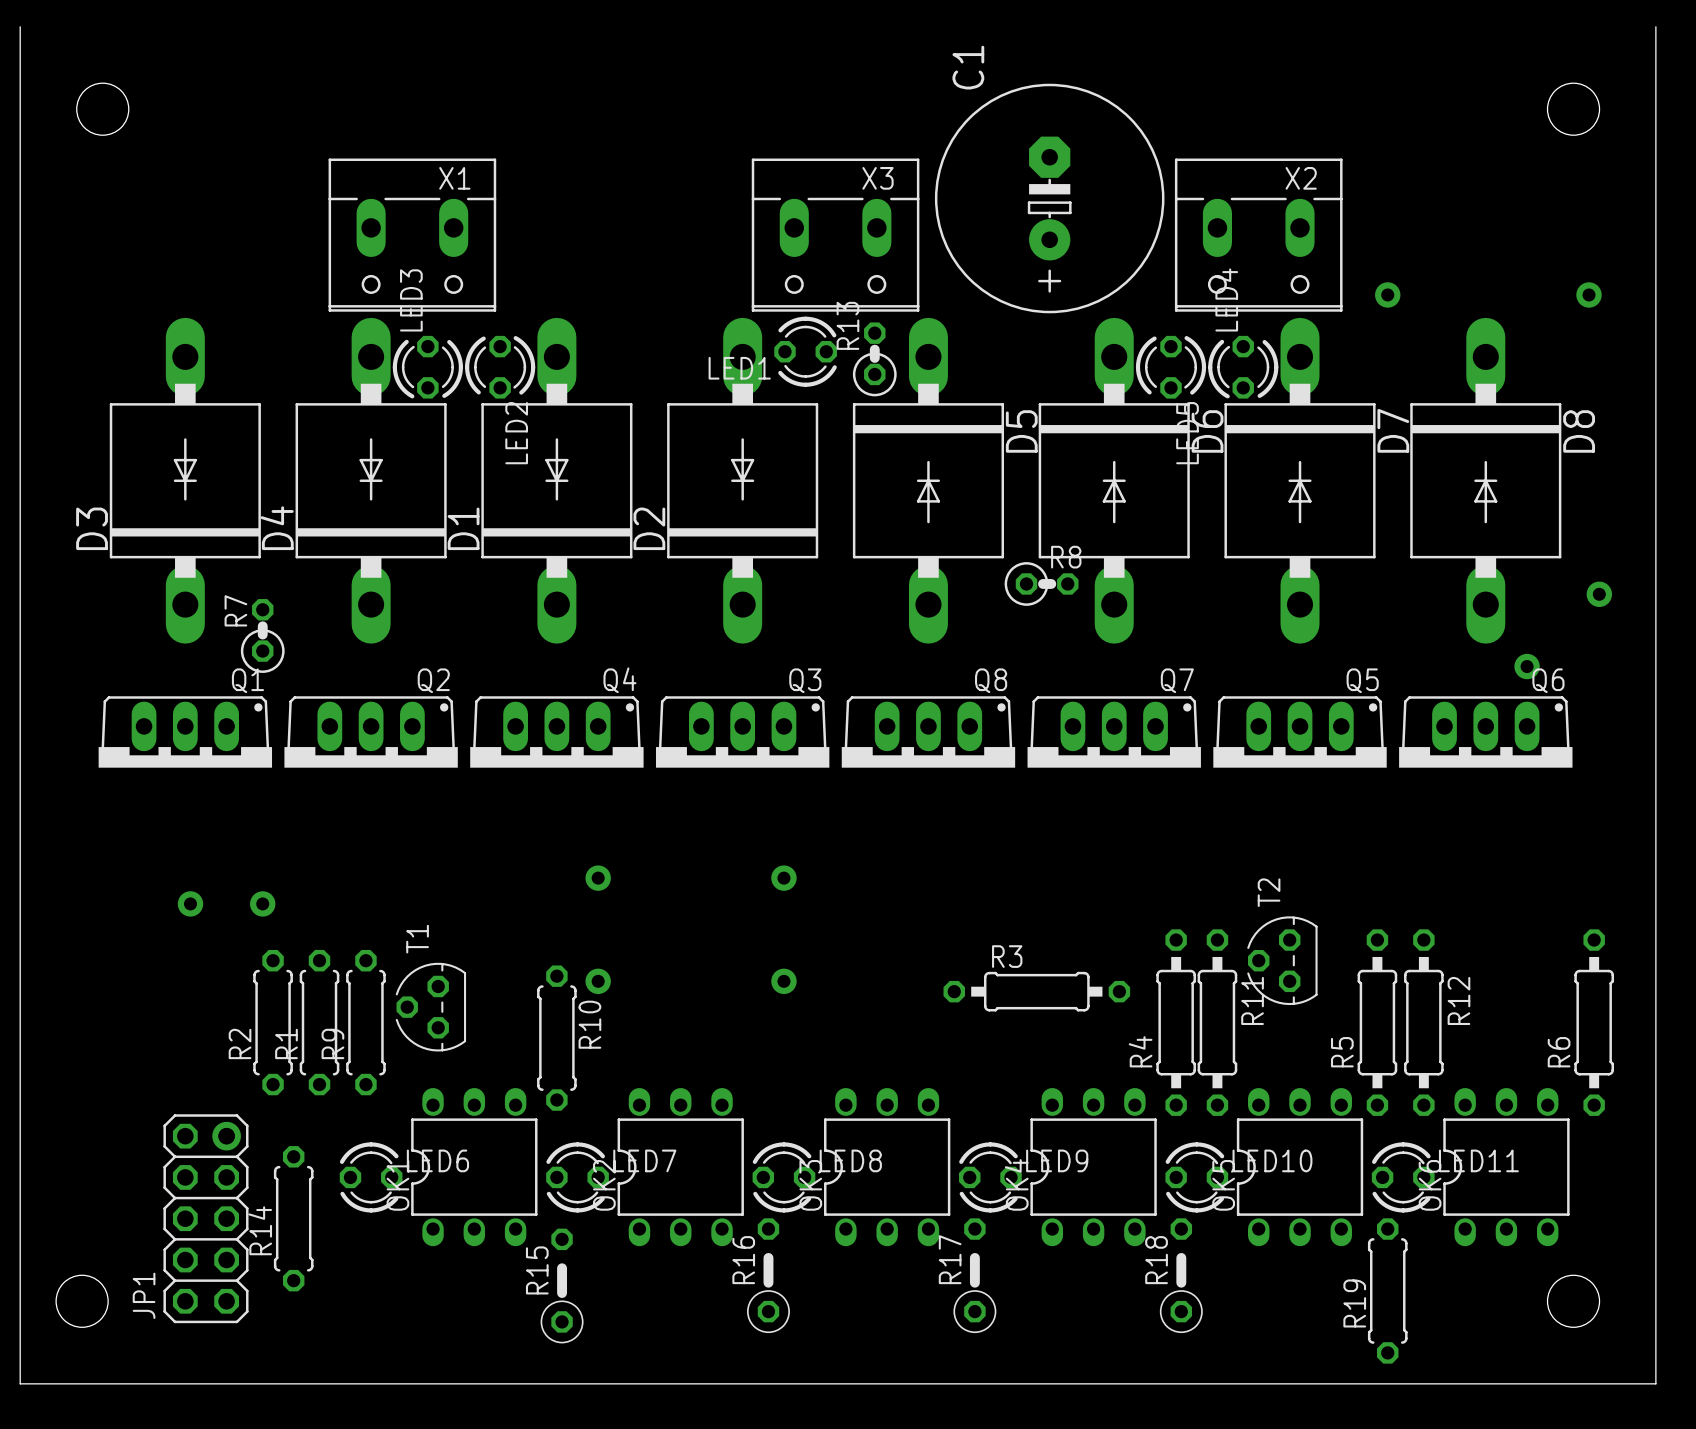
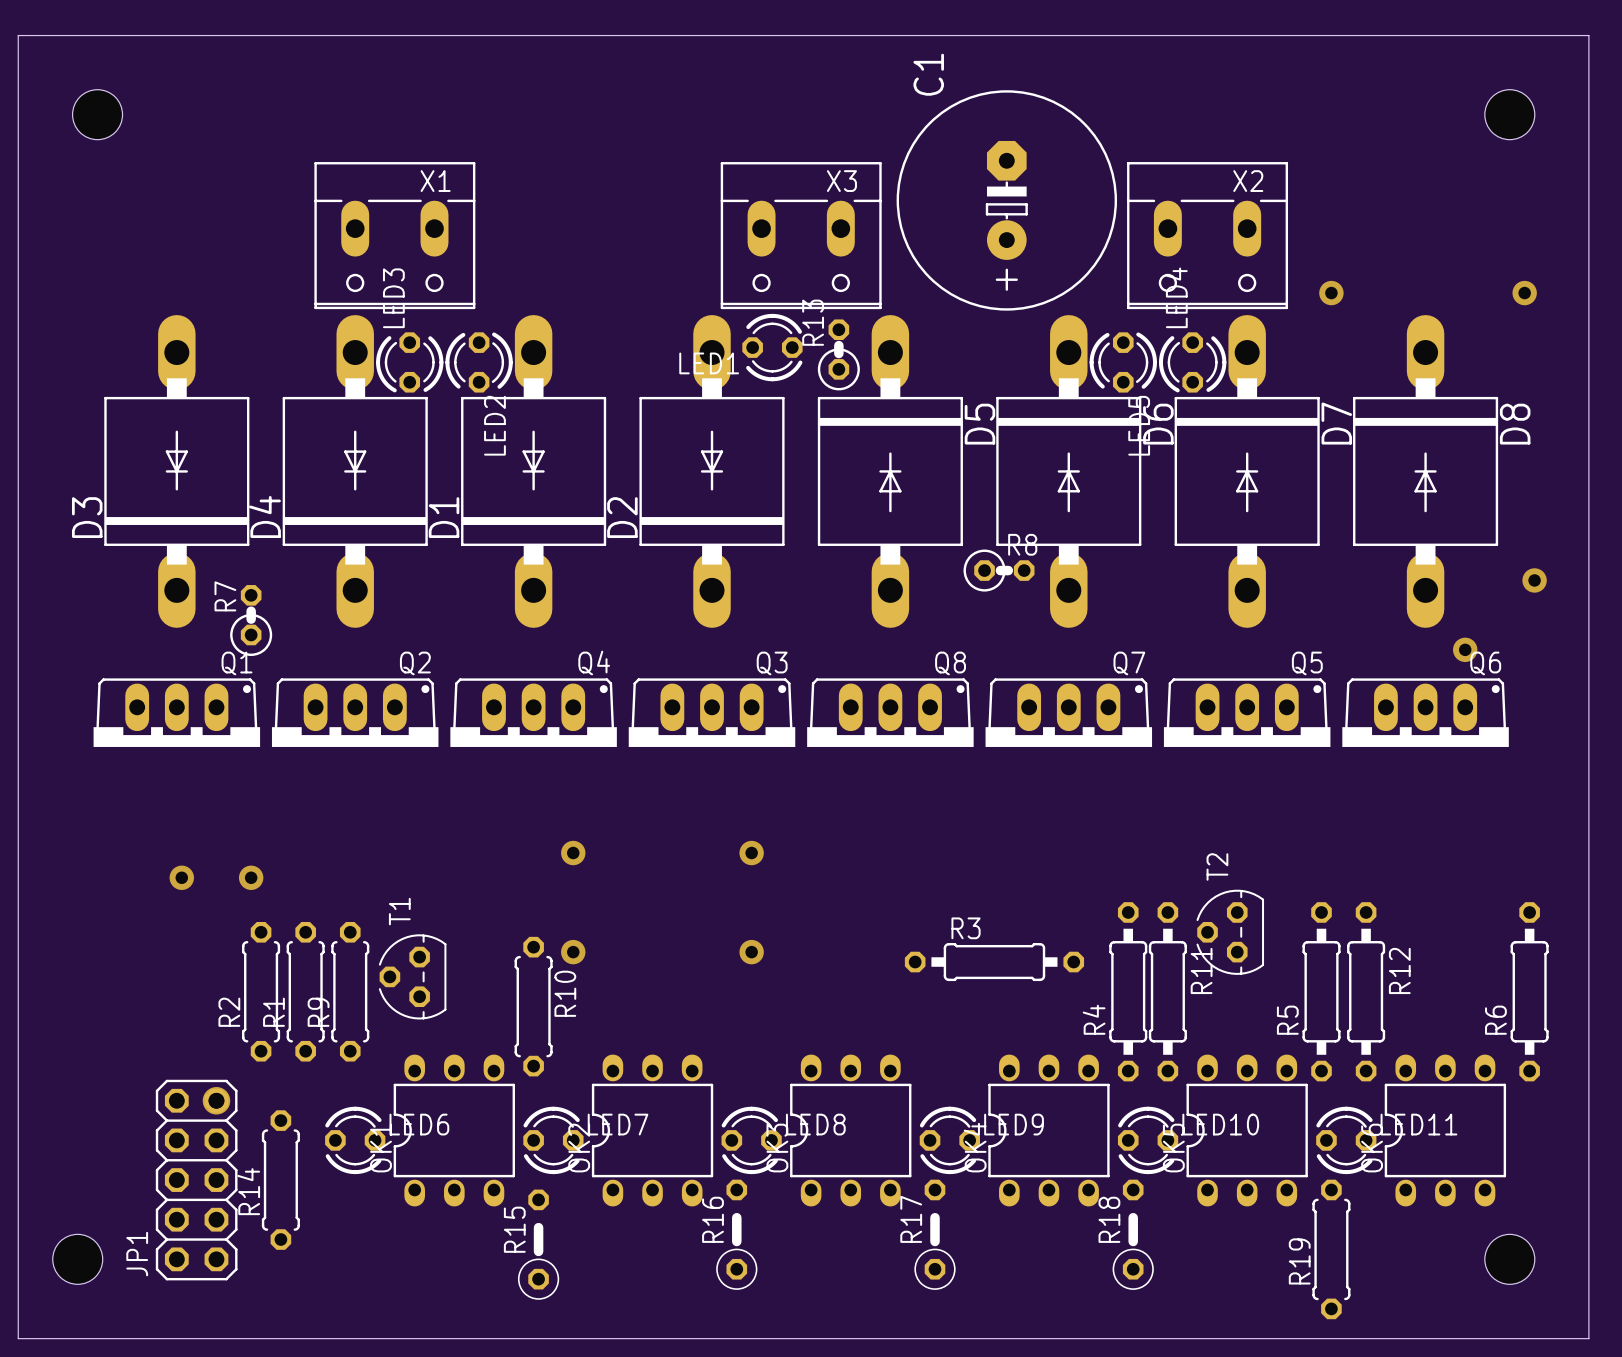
board edge: none -> (18, 35) (1588, 35)

